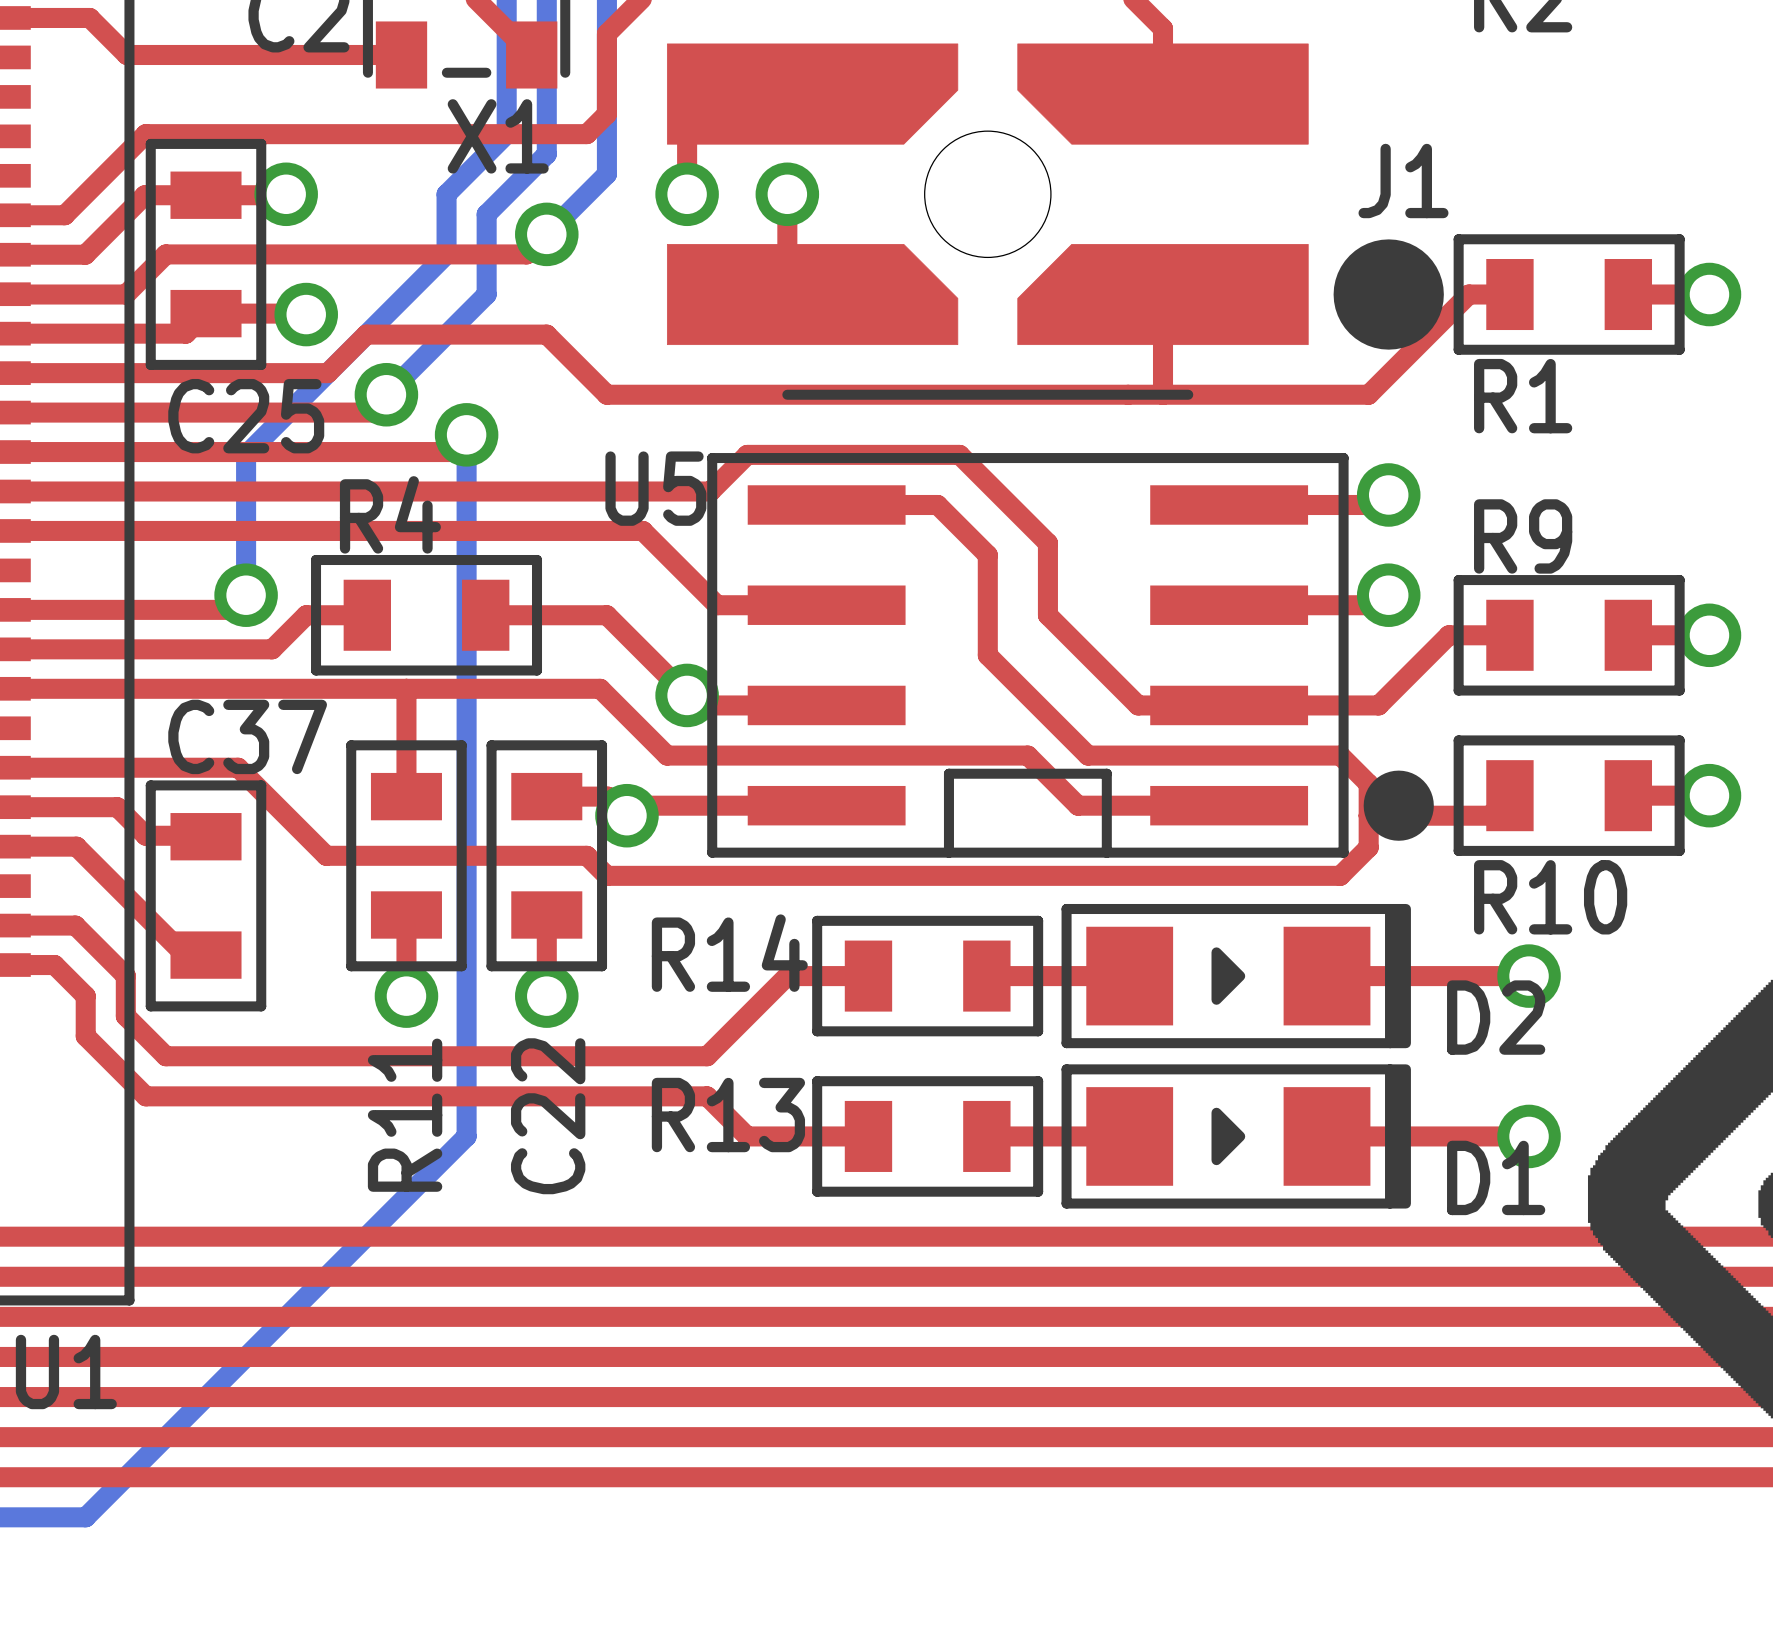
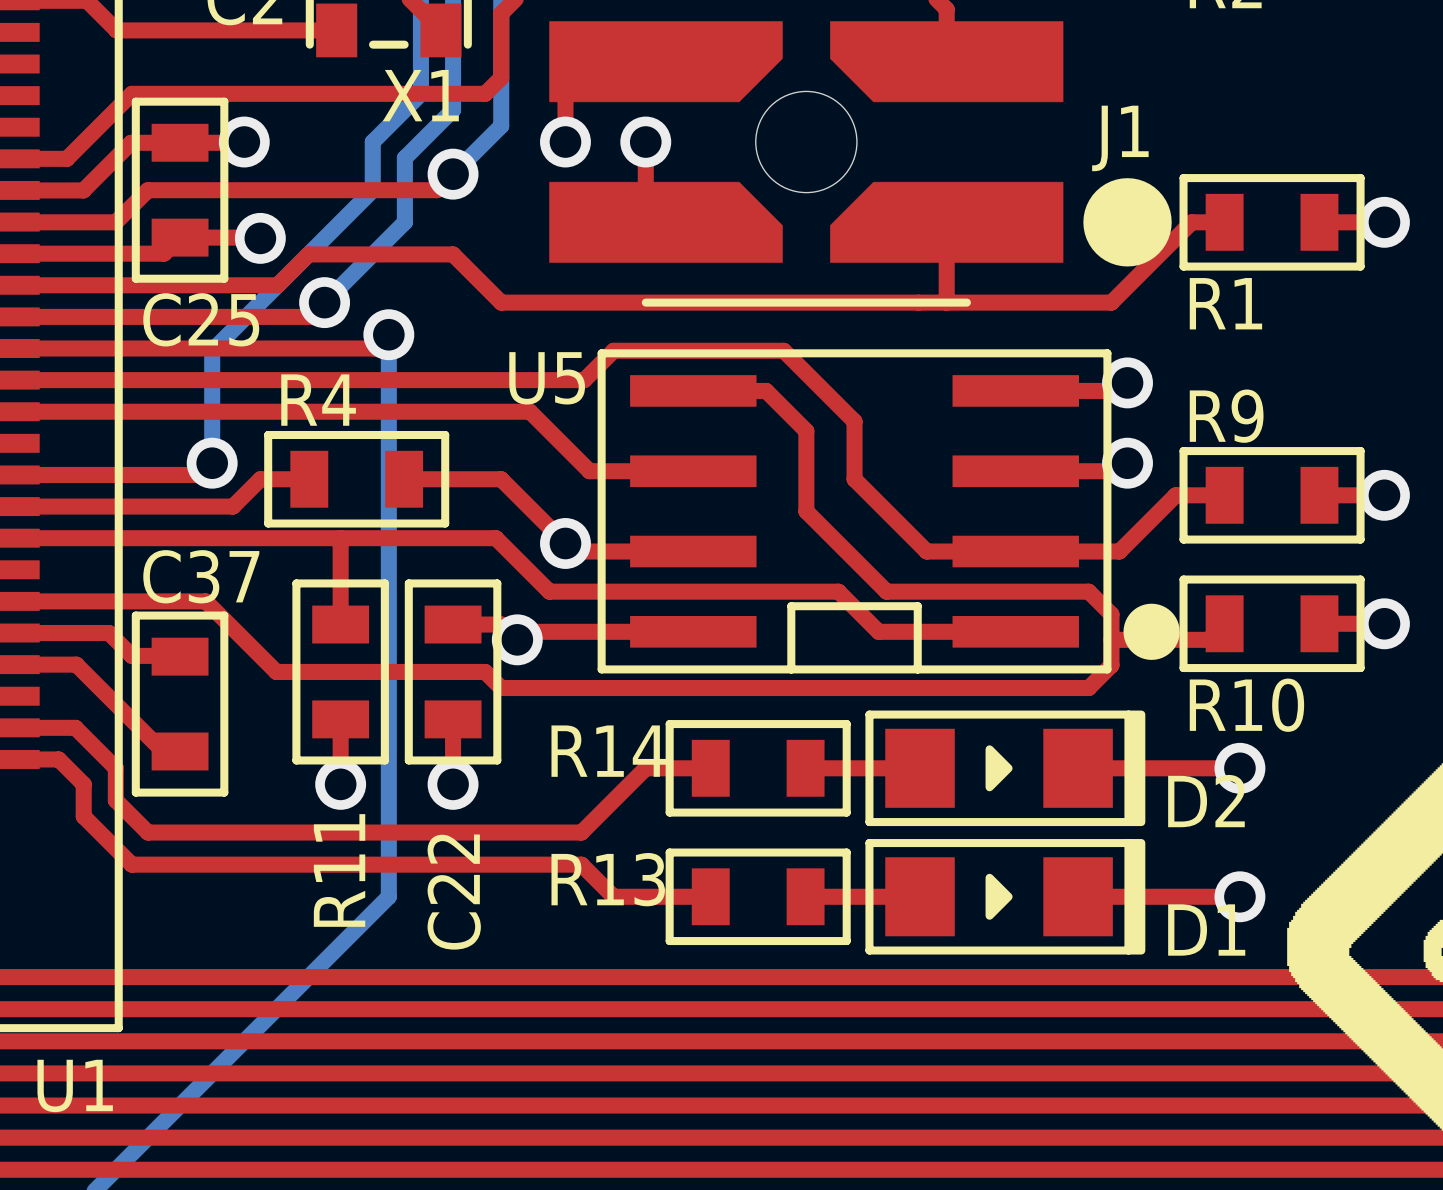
U5 position: (1070, 655) -> (888, 511)

